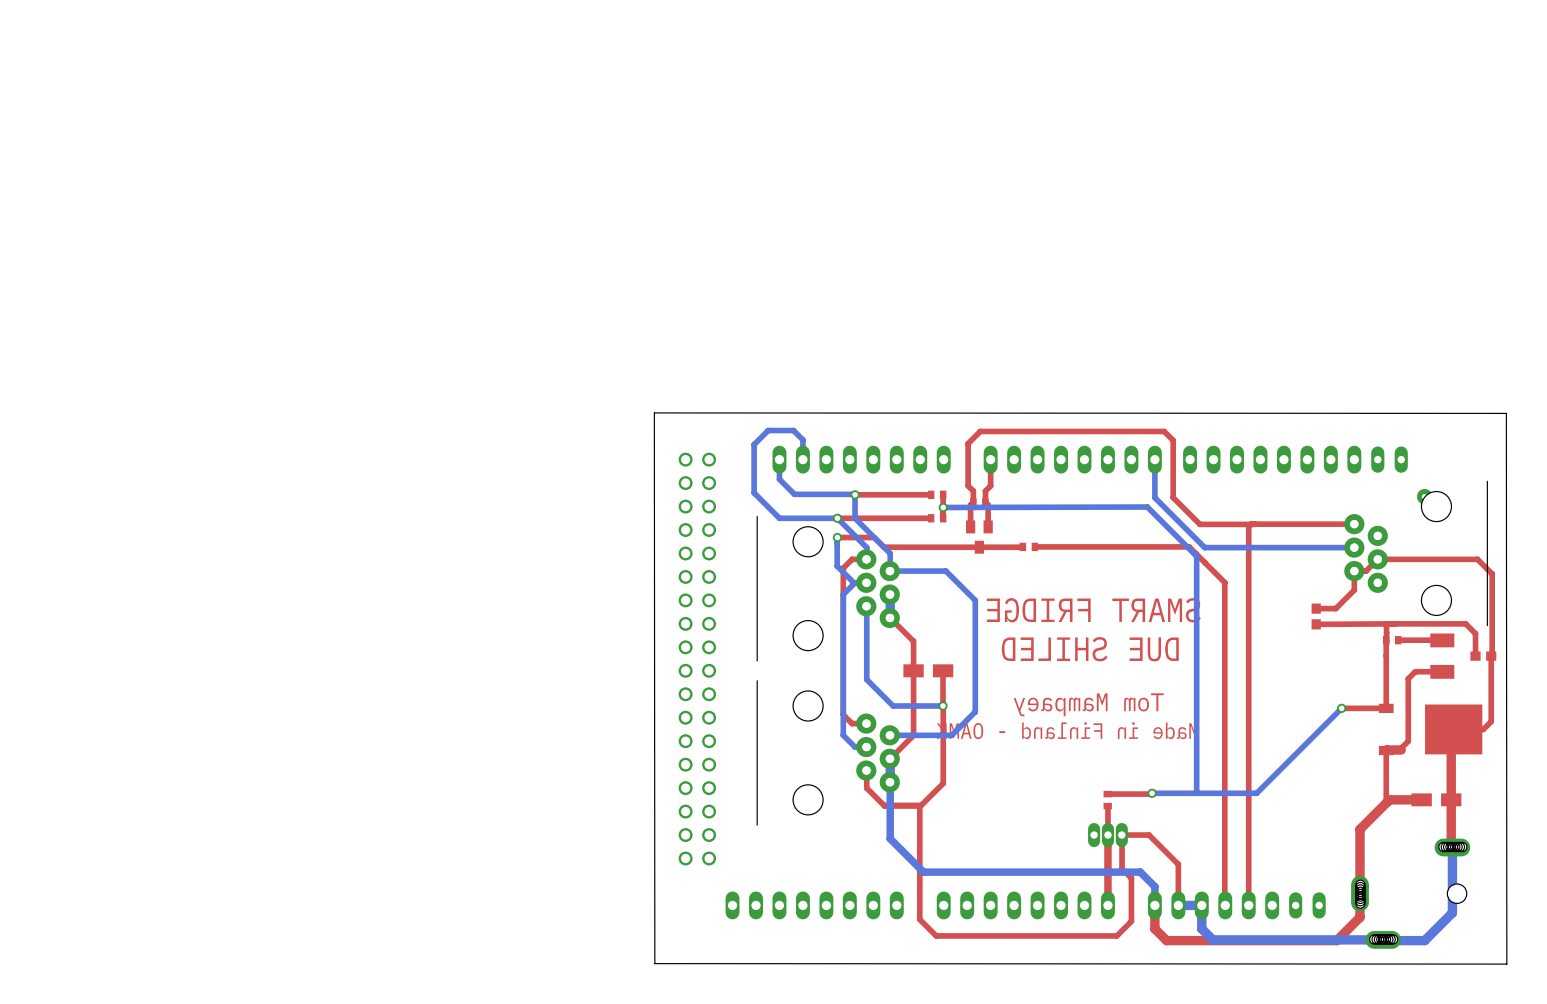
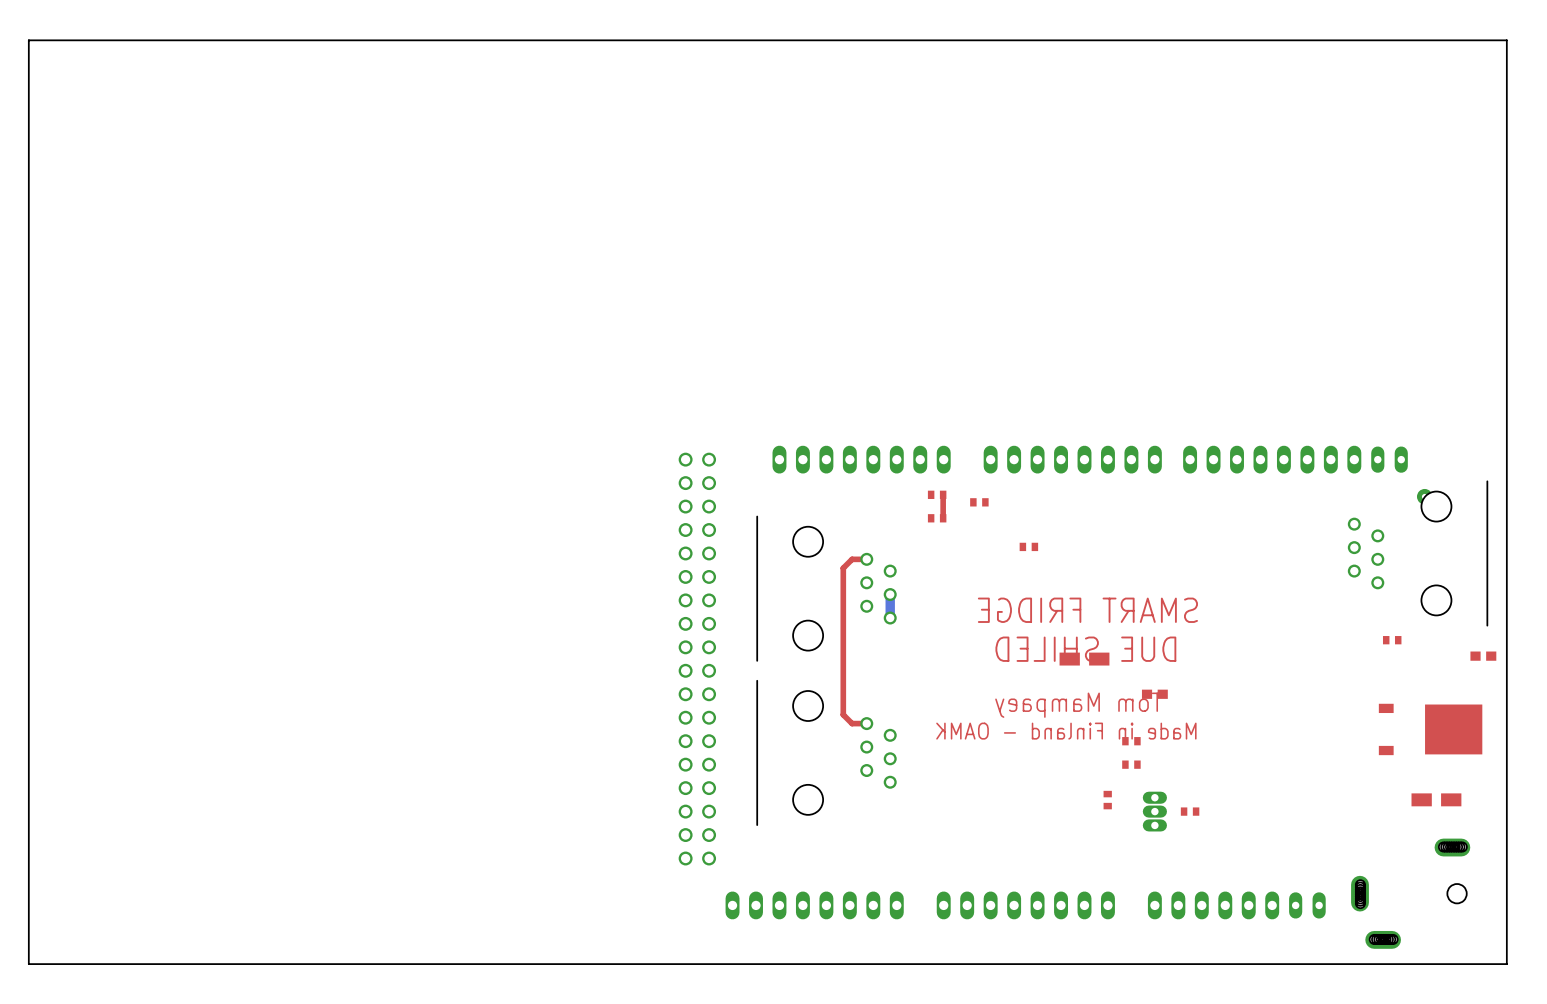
board edge: none -> (1506, 40) (28, 40) (28, 964) (1506, 964) (1506, 40)
board edge: (654, 412) (654, 963) (1506, 964) (1506, 413) (654, 412) -> none
bottom track: (779, 459) (779, 479) (794, 494) (855, 494) (855, 518) (890, 553) (890, 571) (945, 571) (975, 600) (975, 711) (951, 735) (890, 735) -> none
bottom track: (802, 459) (802, 439) (793, 430) (768, 430) (754, 444) (754, 492) (779, 518) (837, 518) (866, 547) (866, 559) -> none
top track: (990, 459) (990, 485) (985, 491) (985, 502) -> none
bottom track: (1154, 459) (1154, 497) (1204, 547) (1354, 547) -> none
via: (855, 494) -> none
top track: (931, 494) (855, 494) -> none
top track: (985, 502) (988, 505) (988, 526) -> none
bottom track: (943, 507) (1147, 507) (1196, 556) (1196, 793) -> none
via: (943, 507) -> none
via: (837, 518) -> none
top track: (931, 518) (837, 518) -> none
top track: (1254, 524) (1199, 524) (1173, 497) (1173, 440) (1164, 431) (980, 431) (968, 443) (968, 485) (973, 491) (973, 502) (970, 505) (970, 526) -> none
top track: (1354, 524) (1251, 524) (1248, 526) (1248, 905) -> none
via: (1354, 524) -> none
via: (1377, 535) -> none
bottom track: (837, 537) (837, 566) (853, 582) (866, 582) -> none
top track: (837, 537) (874, 537) (883, 547) (1022, 546) -> none
via: (837, 537) -> none
part: (979, 537) -> none
top track: (1034, 546) (1189, 546) (1224, 582) (1225, 905) -> none
via: (1354, 547) -> none
via: (866, 559) -> none
via: (1377, 559) -> none
via: (889, 571) -> none
via: (1354, 571) -> none
bottom track: (855, 582) (843, 594) (843, 735) (855, 747) (866, 747) -> none
via: (866, 582) -> none
via: (1377, 582) -> none
via: (889, 594) -> none
bottom track: (866, 606) (866, 679) (893, 705) (943, 705) -> none
via: (866, 606) -> none
top track: (1316, 608) (1335, 608) (1354, 590) (1354, 571) (1366, 571) (1377, 559) (1477, 559) (1492, 574) (1491, 721) (1483, 729) (1442, 729) (1451, 738) (1452, 847) -> none
part rotation: 0° (1316, 616) -> 90° clockwise (1154, 694)
part position: (1316, 616) -> (1154, 694)
via: (889, 618) -> none
top track: (890, 618) (913, 641) (913, 735) (890, 758) -> none
top track: (1386, 623) (1465, 623) (1475, 633) (1475, 656) -> none
top track: (1386, 623) (1386, 708) -> none
top track: (1386, 623) (1394, 623) (1316, 624) -> none
top track: (1398, 640) (1442, 640) -> none
part: (1442, 656) -> none
part position: (928, 670) -> (1084, 659)
top track: (943, 670) (943, 783) (921, 805) (884, 805) -> none
top track: (1442, 671) (1415, 671) (1408, 678) (1408, 741) (1401, 749) (1386, 750) (1387, 802) -> none
via: (943, 705) -> none
bottom track: (1341, 708) (1256, 793) (1152, 793) -> none
via: (1341, 708) -> none
top track: (1386, 708) (1341, 708) -> none
via: (866, 723) -> none
via: (889, 735) -> none
part: none -> (1131, 741)
via: (866, 747) -> none
via: (889, 758) -> none
bottom track: (890, 758) (890, 838) (923, 872) (1140, 872) (1154, 886) (1154, 905) -> none
part: none -> (1131, 764)
top track: (866, 770) (866, 788) (884, 805) (919, 805) (919, 919) (936, 935) (1116, 935) (1131, 921) (1131, 878) (1122, 868) (1121, 835) (1149, 835) (1178, 864) (1178, 905) -> none
via: (866, 770) -> none
via: (889, 782) -> none
top track: (1152, 793) (1107, 794) -> none
via: (1152, 793) -> none
top track: (1421, 799) (1389, 799) (1359, 829) (1359, 917) (1336, 940) (1166, 940) (1154, 928) (1154, 905) -> none
top track: (1107, 806) (1107, 905) -> none
part: none -> (1190, 811)
part rotation: 0° (1107, 835) -> 90° clockwise (1154, 811)
part position: (1107, 835) -> (1154, 811)
bottom track: (1452, 847) (1452, 912) (1424, 940) (1212, 939) (1201, 928) (1201, 905) (1178, 905) -> none

